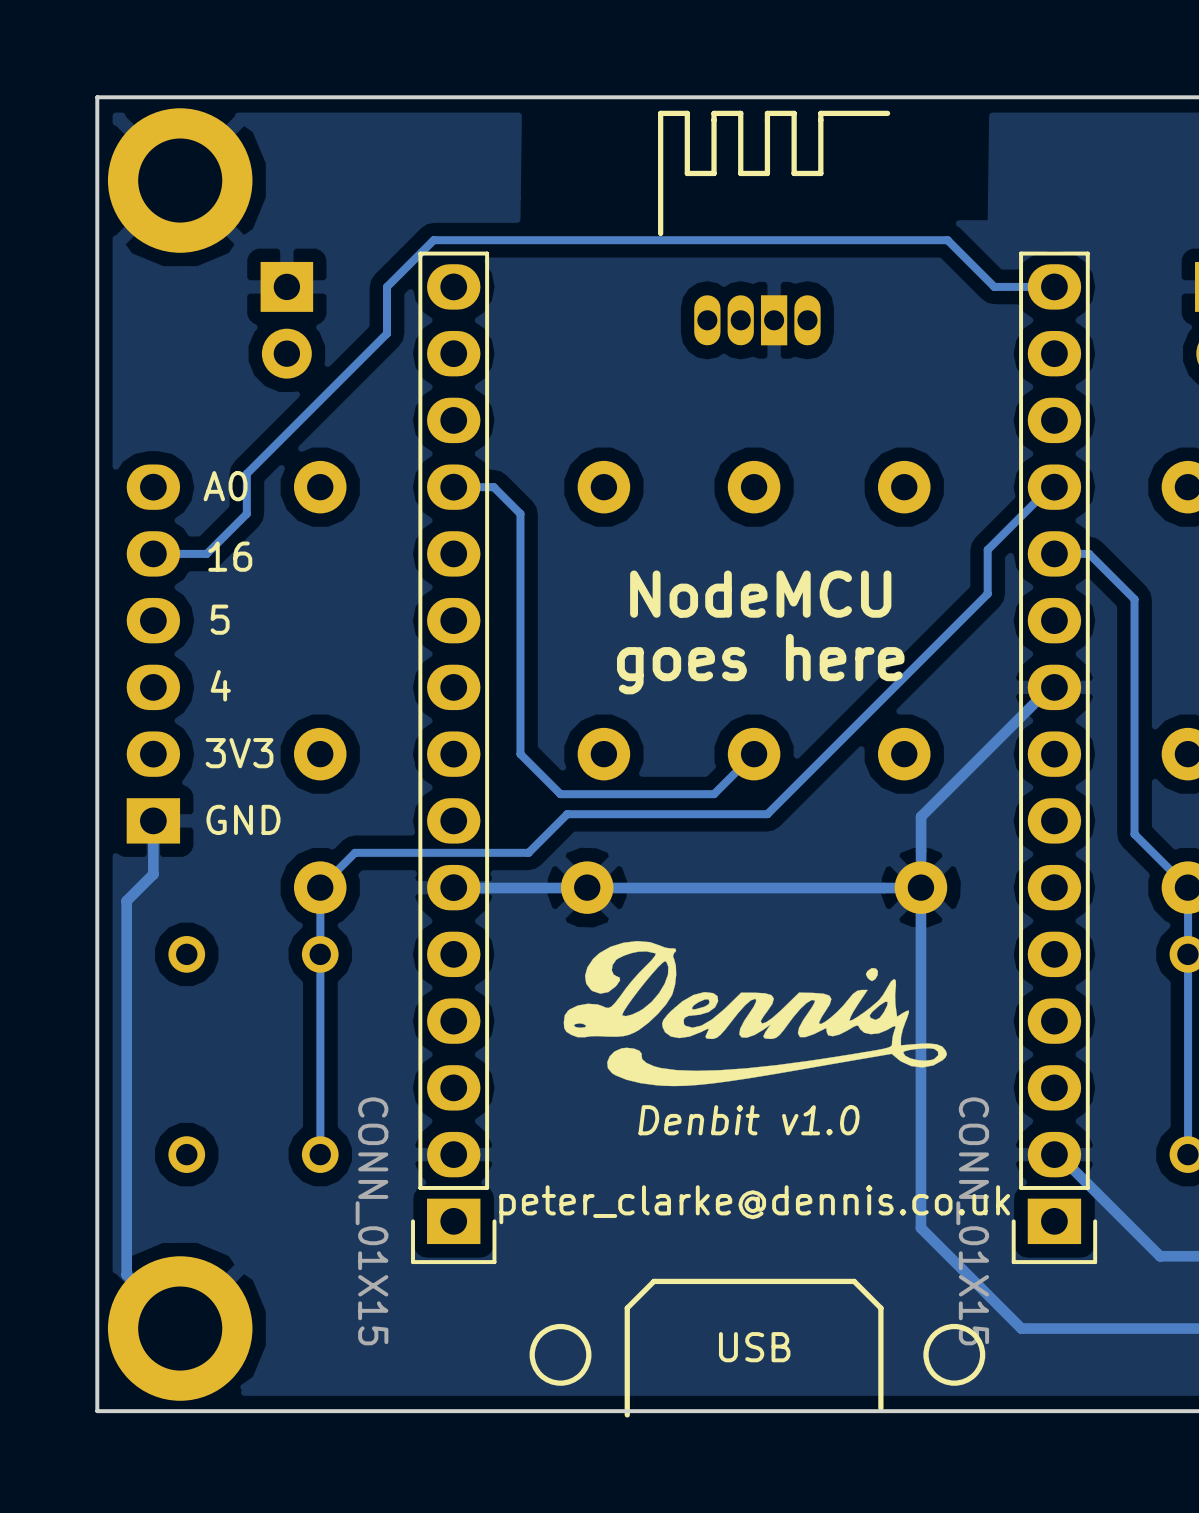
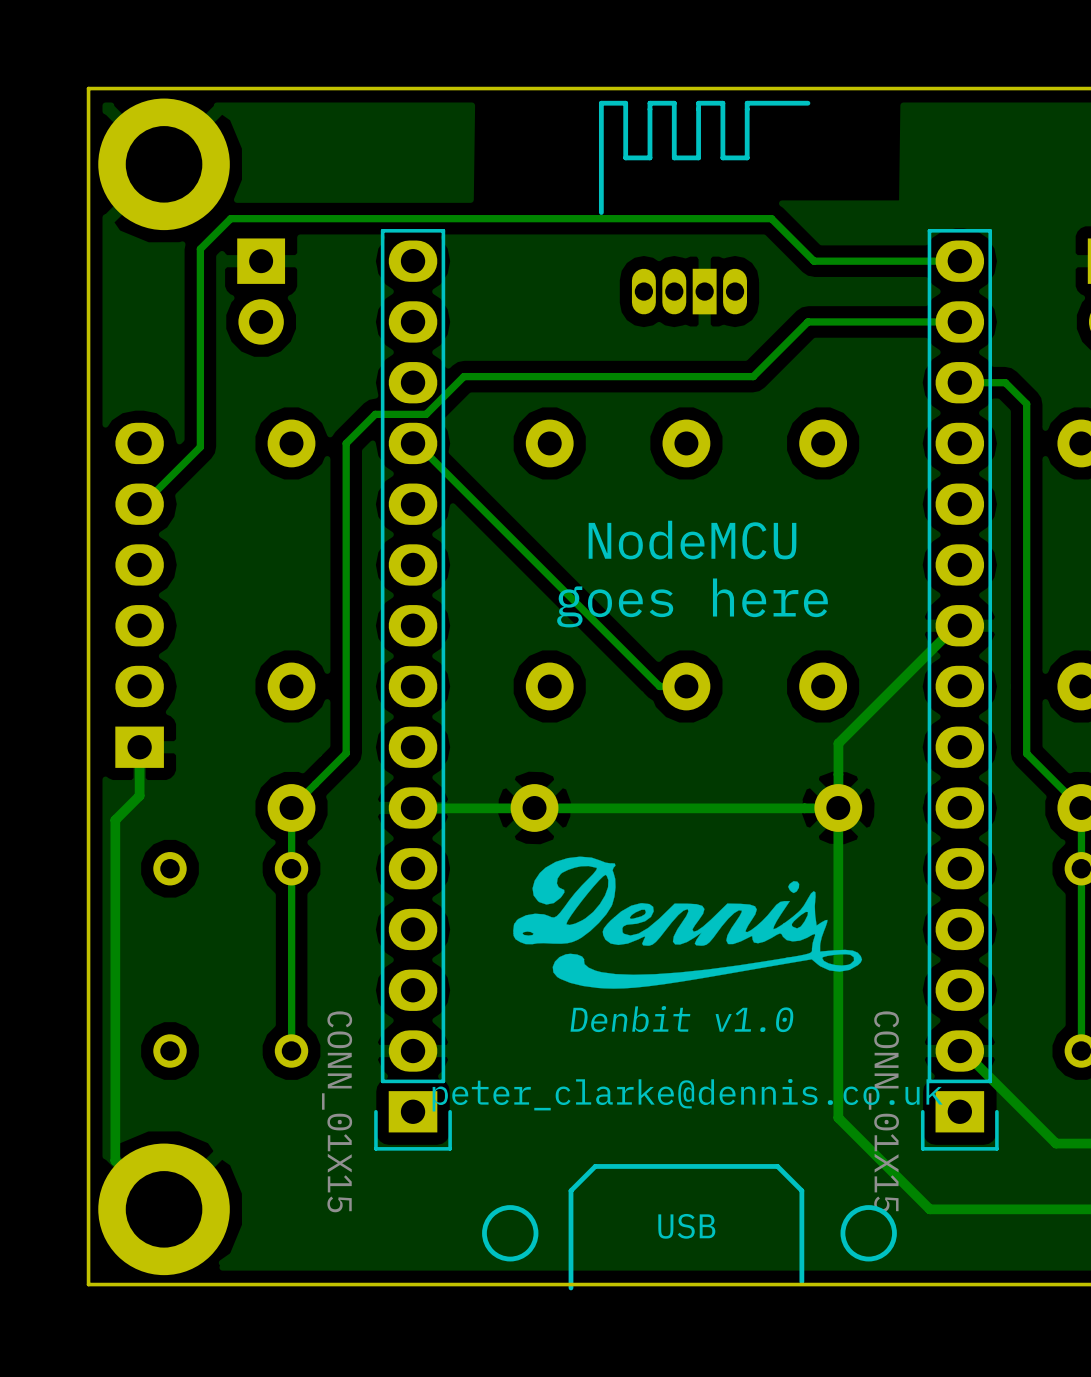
track: (433, 240) (386, 286) (386, 333) (246, 473) (246, 513) (206, 553) (157, 553) -> (394, 218) (230, 218) (200, 249) (200, 447) (143, 504)
track: (847, 240) (947, 240) (994, 286) -> (771, 218) (814, 261) (905, 261)
text: A0 (225, 486) -> none
track: (457, 487) (493, 487) (520, 513) (520, 754) (560, 794) (714, 794) (754, 754) -> (416, 443) (659, 686) (686, 686)
track: (1054, 487) (1050, 487) (987, 549) (987, 593) (767, 814) (567, 814) (528, 852) (355, 852) -> (956, 321) (807, 321) (753, 376) (463, 376) (426, 414) (375, 414) (346, 443) (346, 753) (323, 776)
track: (1054, 553) (1089, 553) (1134, 599) (1134, 834) (1187, 887) -> (959, 382) (1005, 382) (1026, 403) (1026, 753) (1081, 808)
text: 16 (230, 556) -> none
text: 5 (220, 619) -> none
text: 4 (220, 685) -> none
text: 3V3 (239, 753) -> none
text: GND (243, 819) -> none

